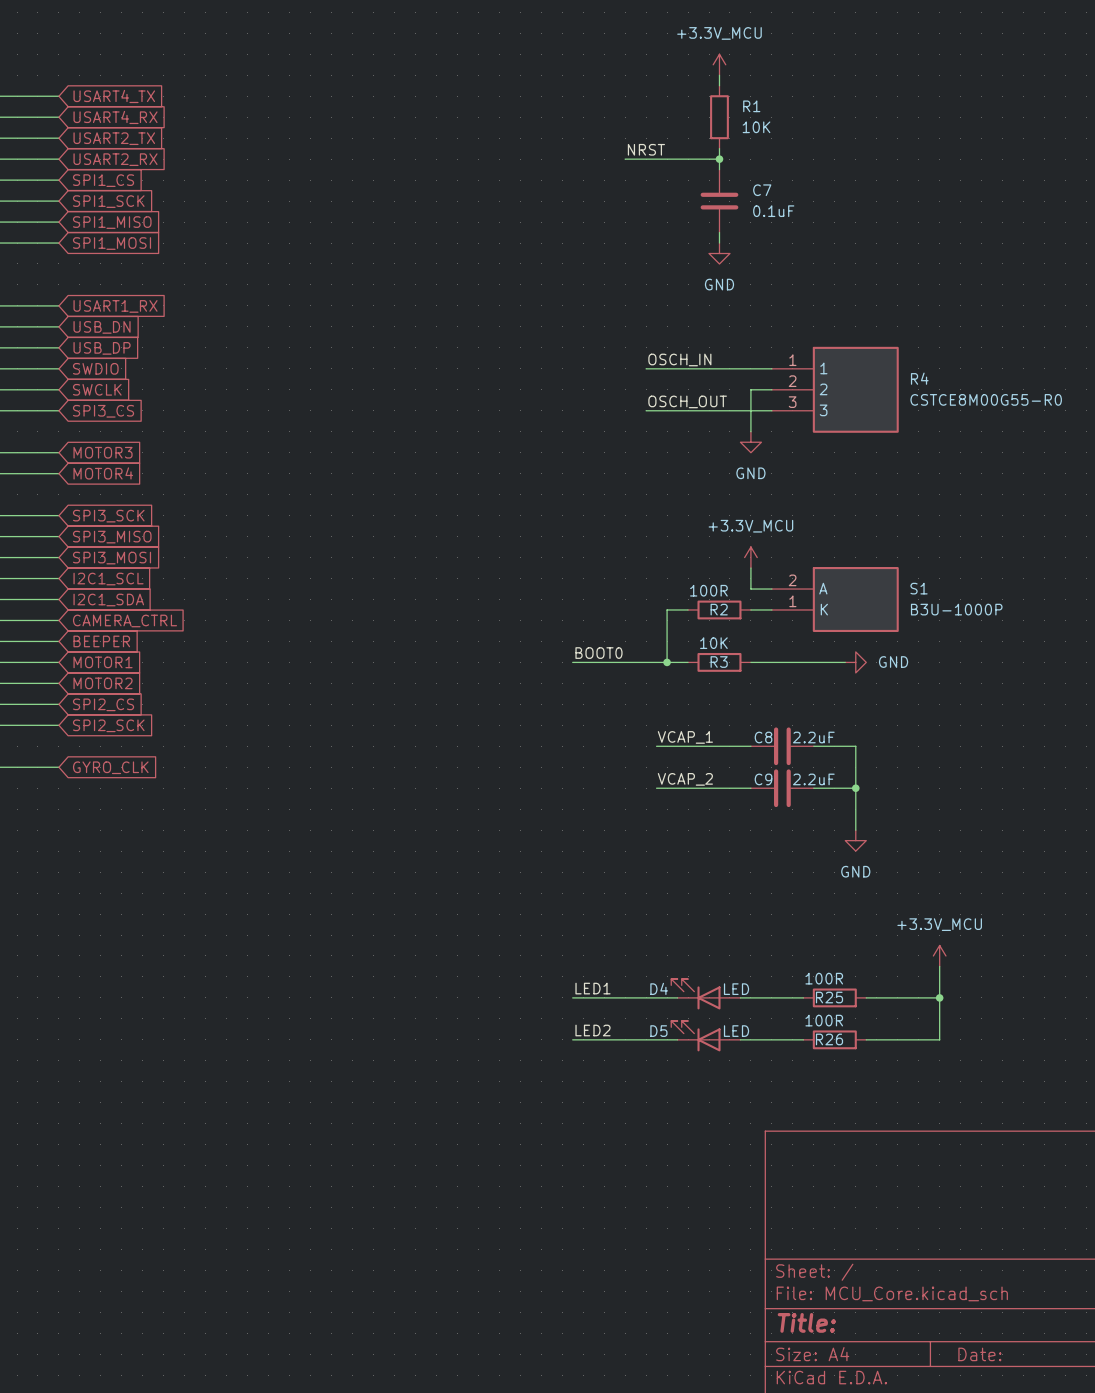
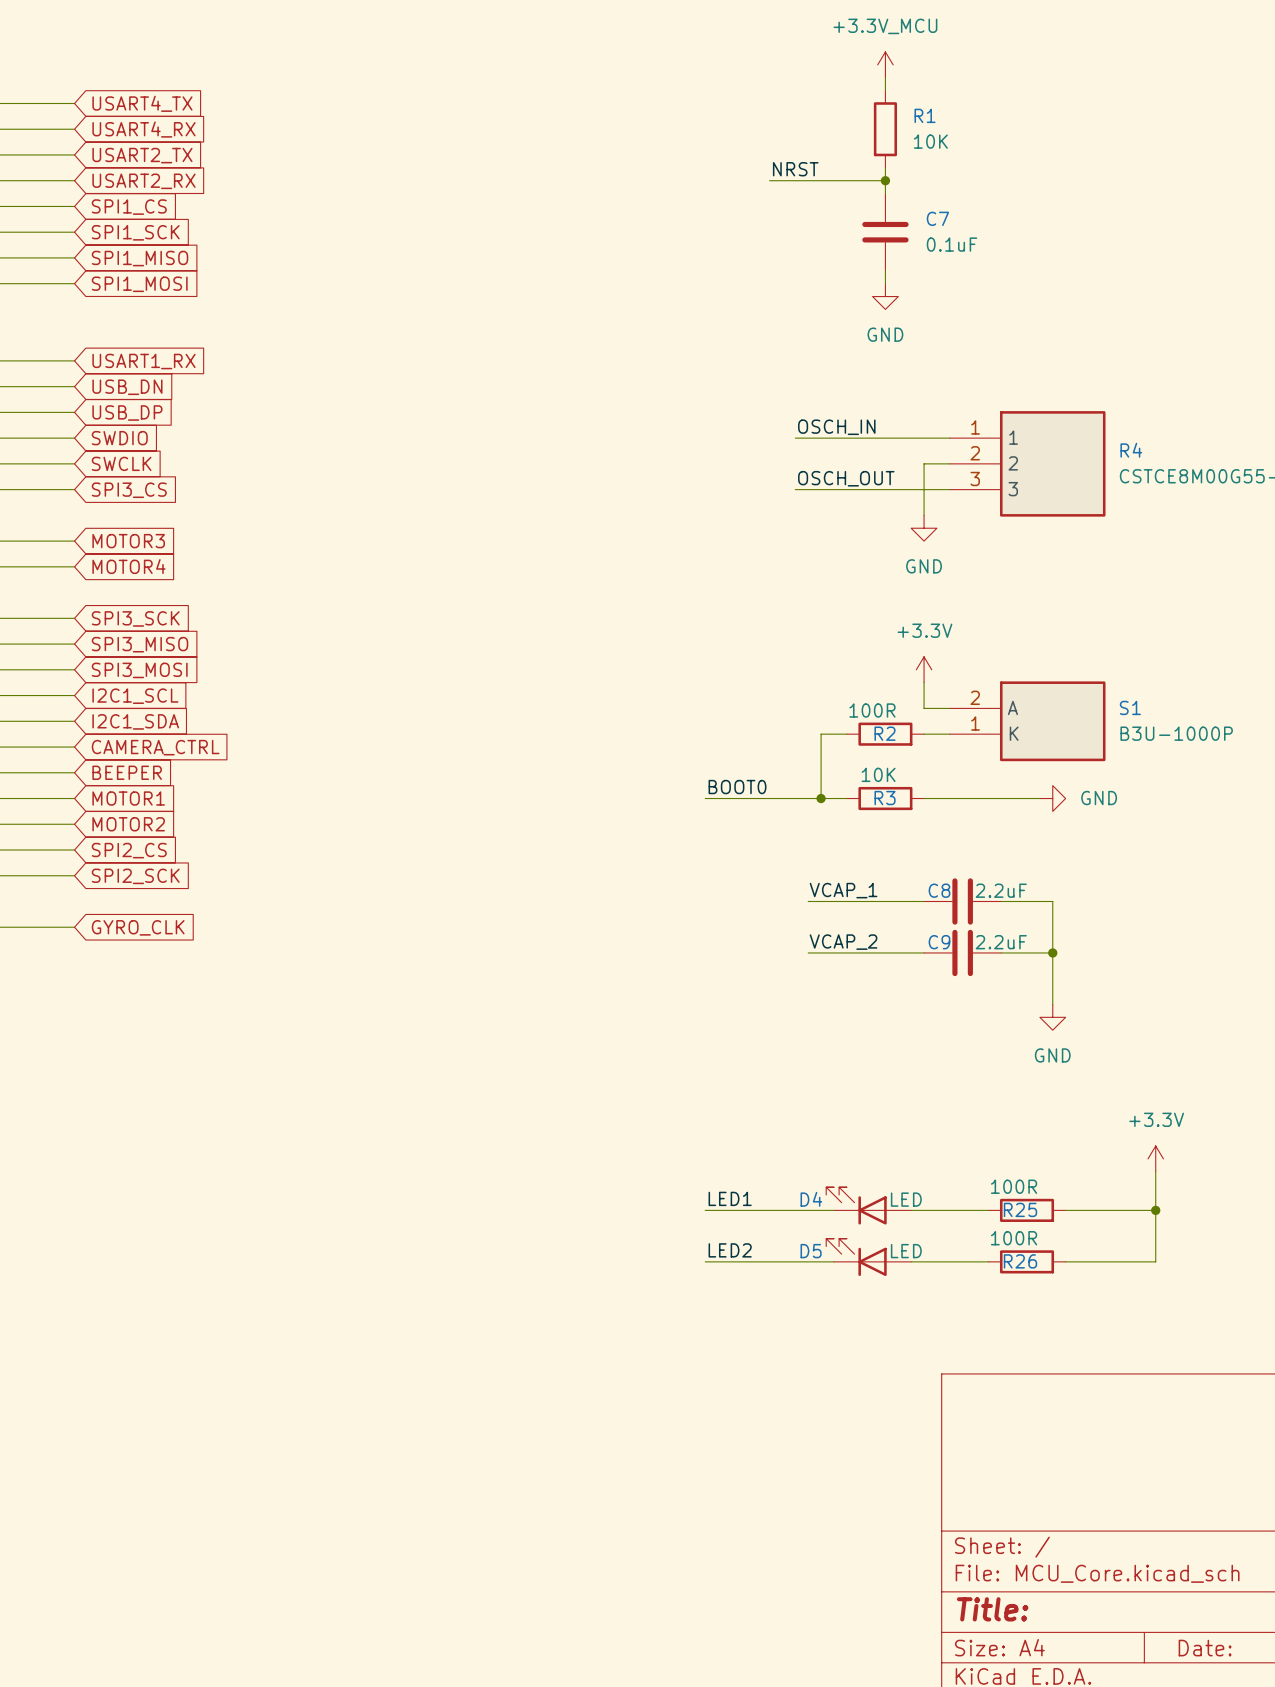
power symbol: +3.3V_MCU (750, 557) -> +3.3V (924, 669)
power symbol: +3.3V_MCU (939, 955) -> +3.3V (1155, 1158)

